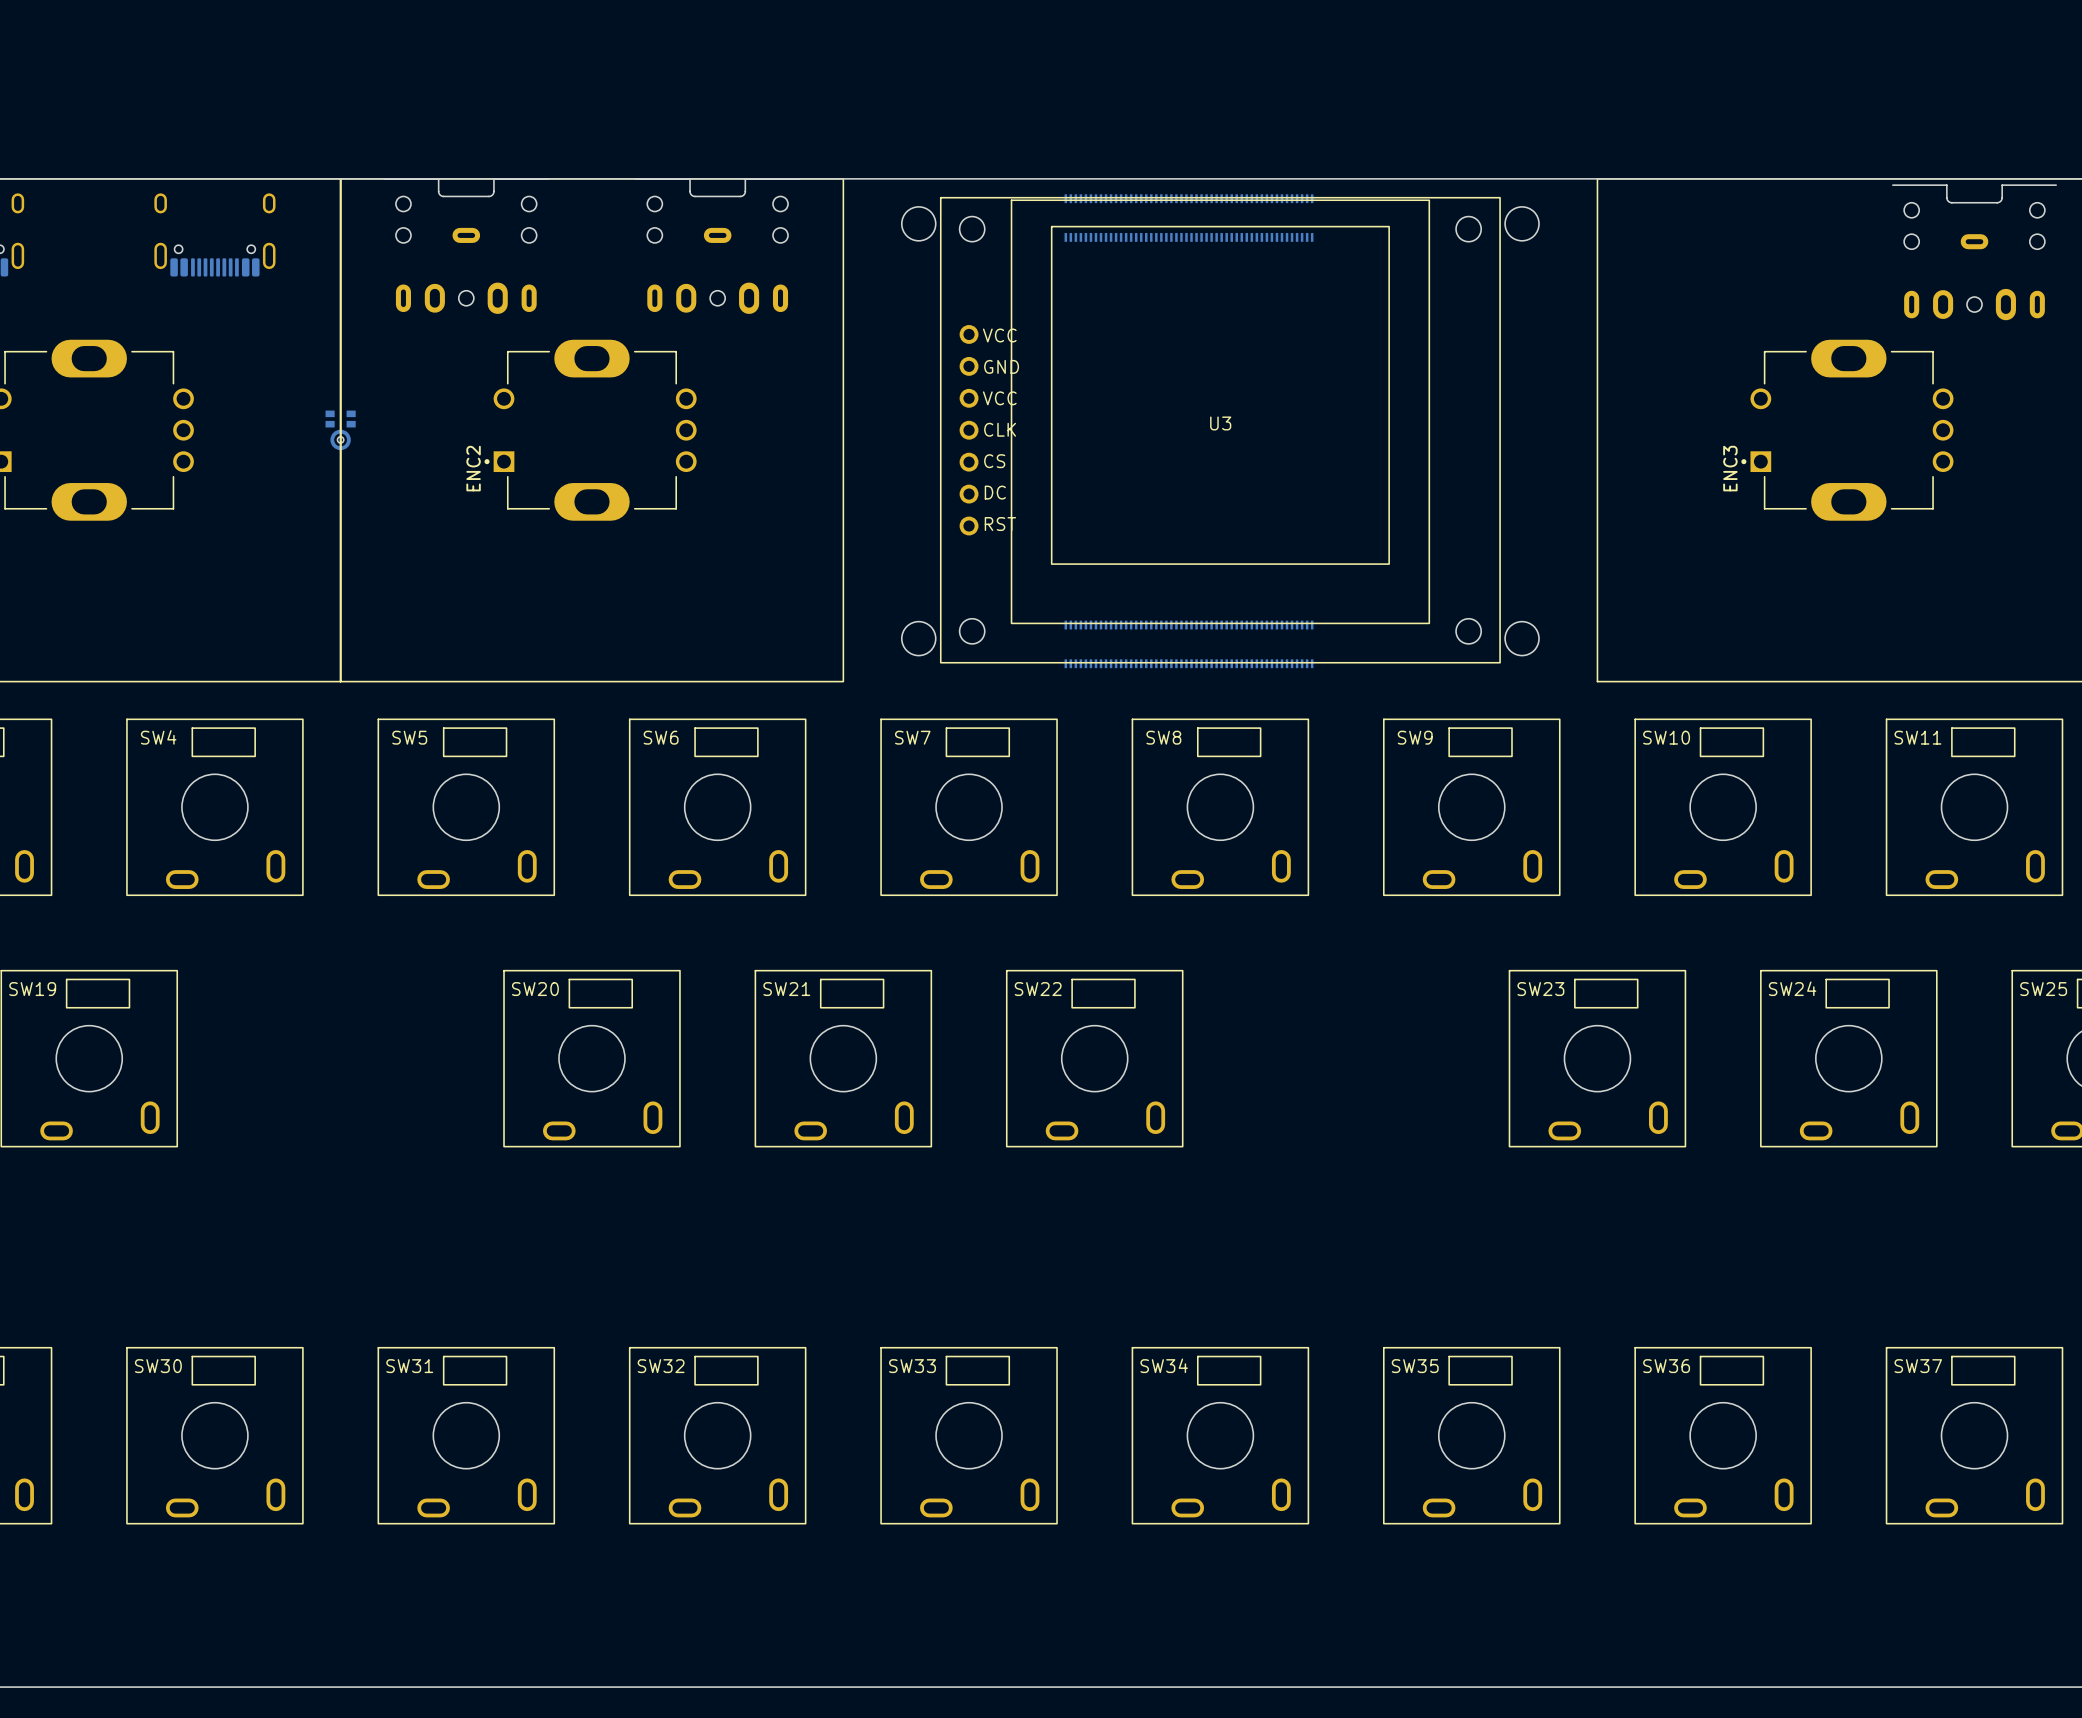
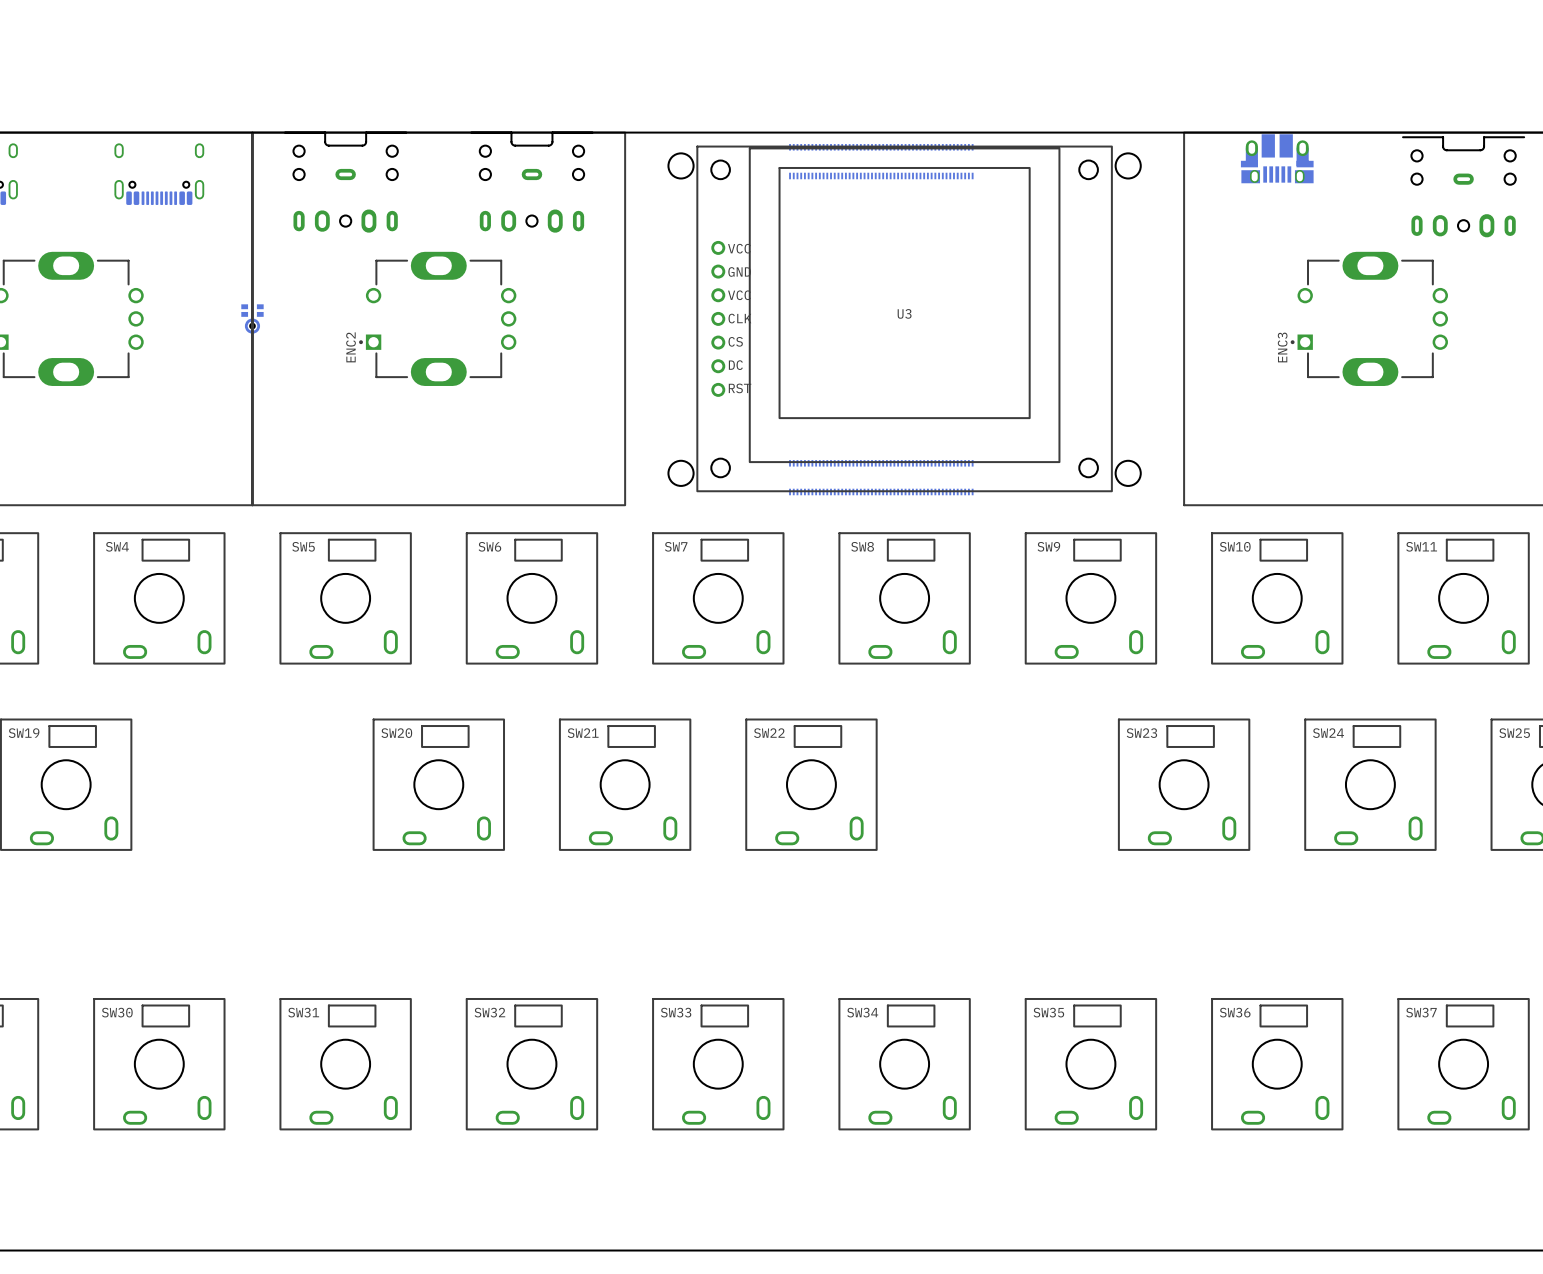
part: none -> (1277, 158)

